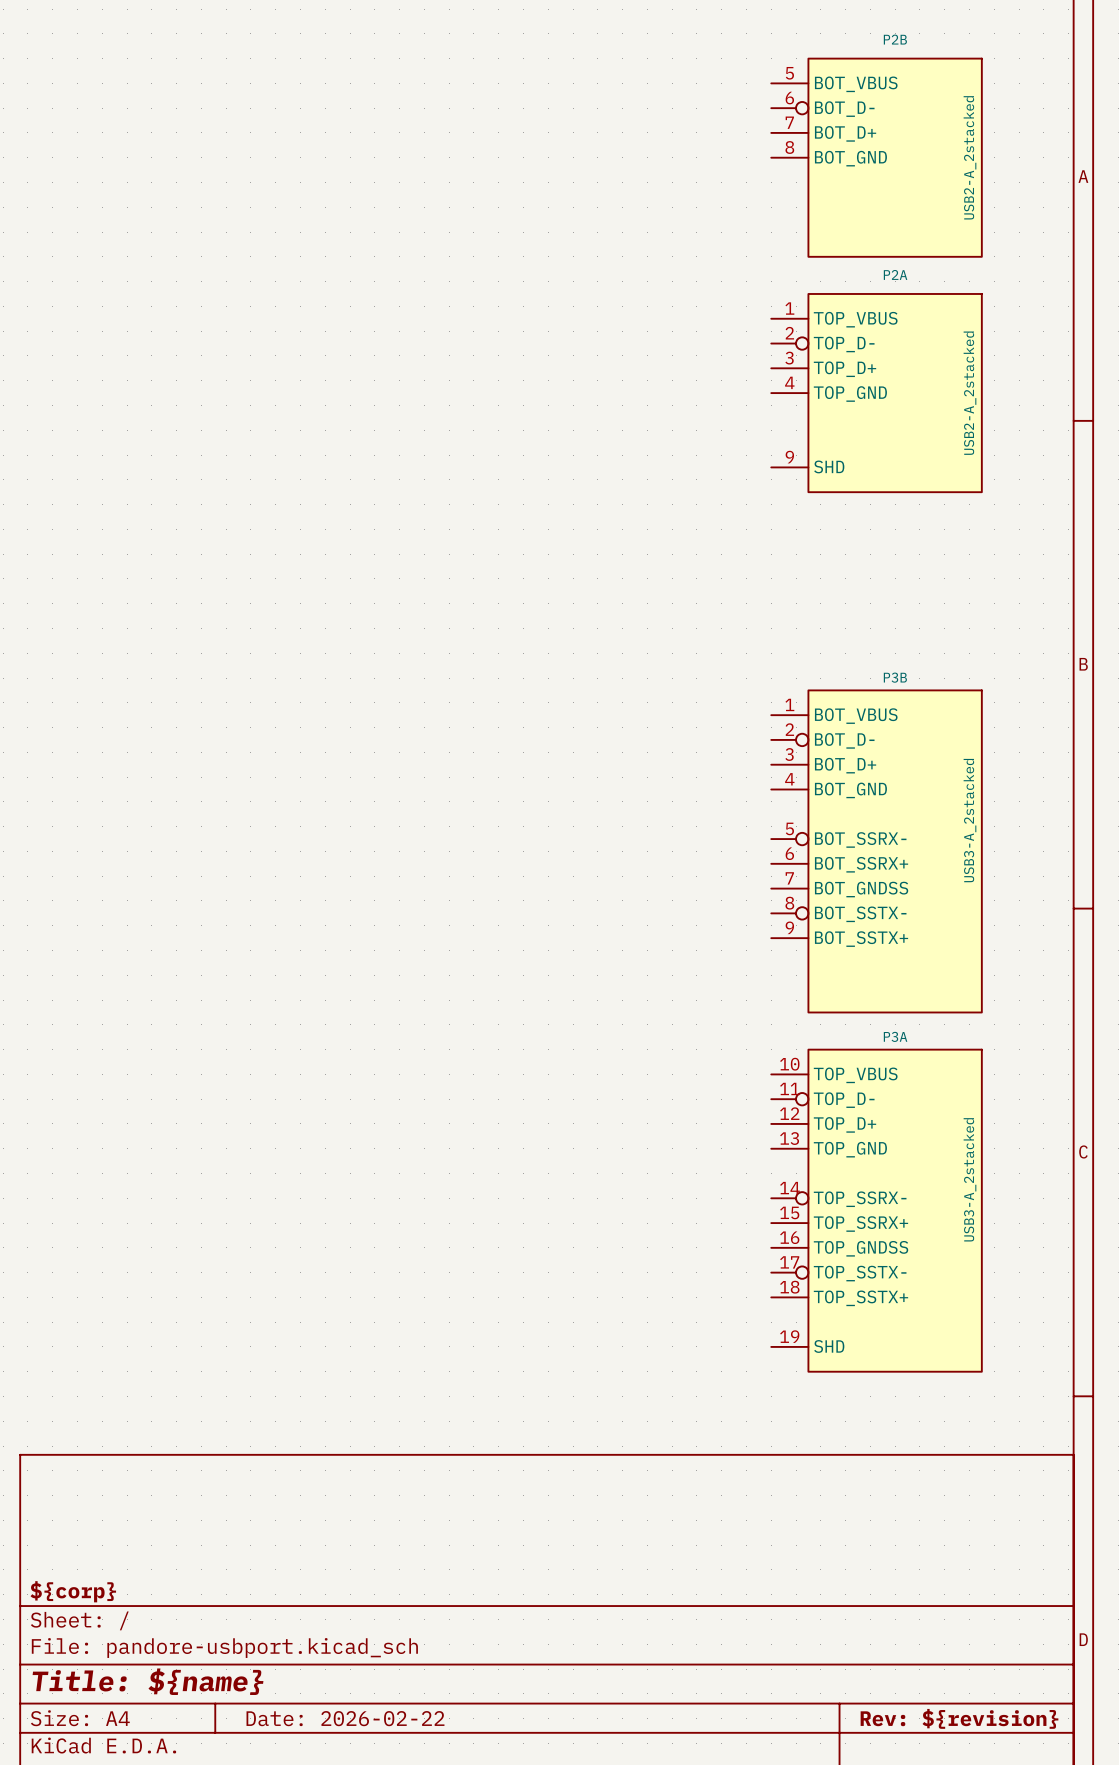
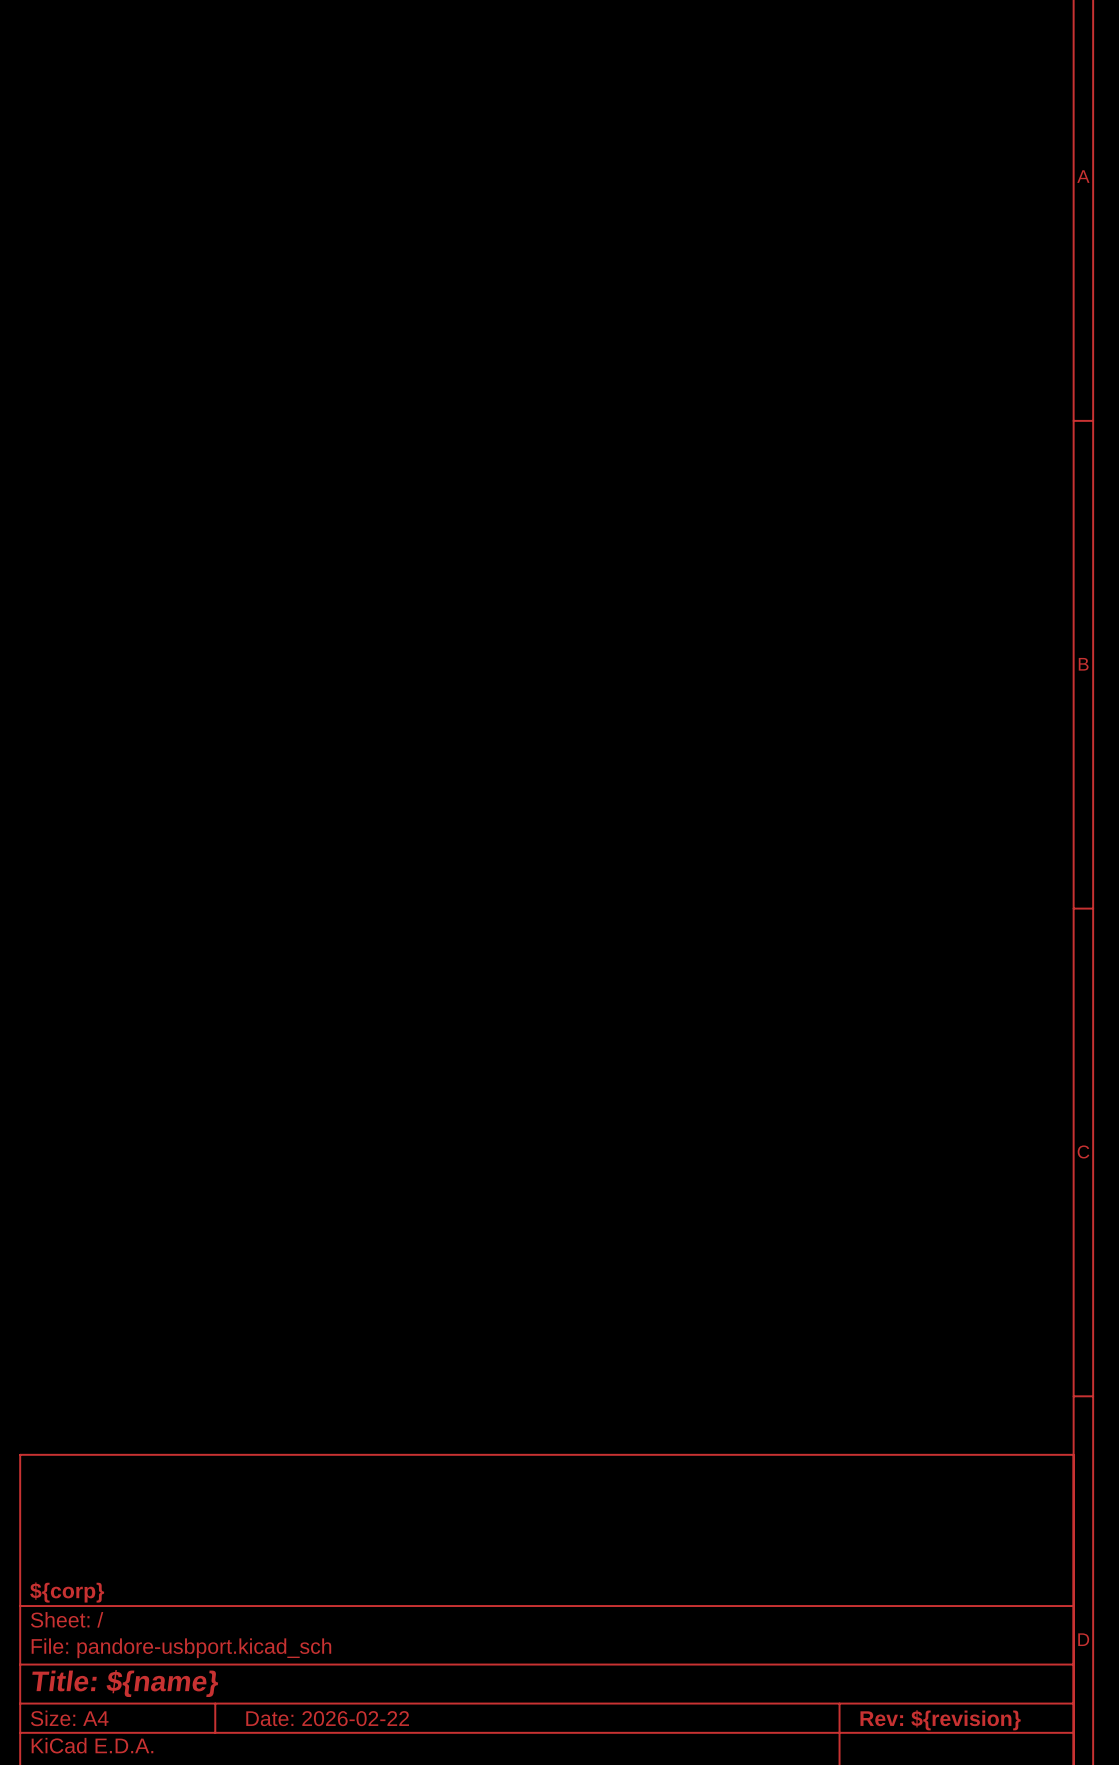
P2B: USB2-A_2stacked (876, 157) -> none
P2A: USB2-A_2stacked (876, 393) -> none
P3B: USB3-A_2stacked (876, 851) -> none
P3A: USB3-A_2stacked (876, 1210) -> none

